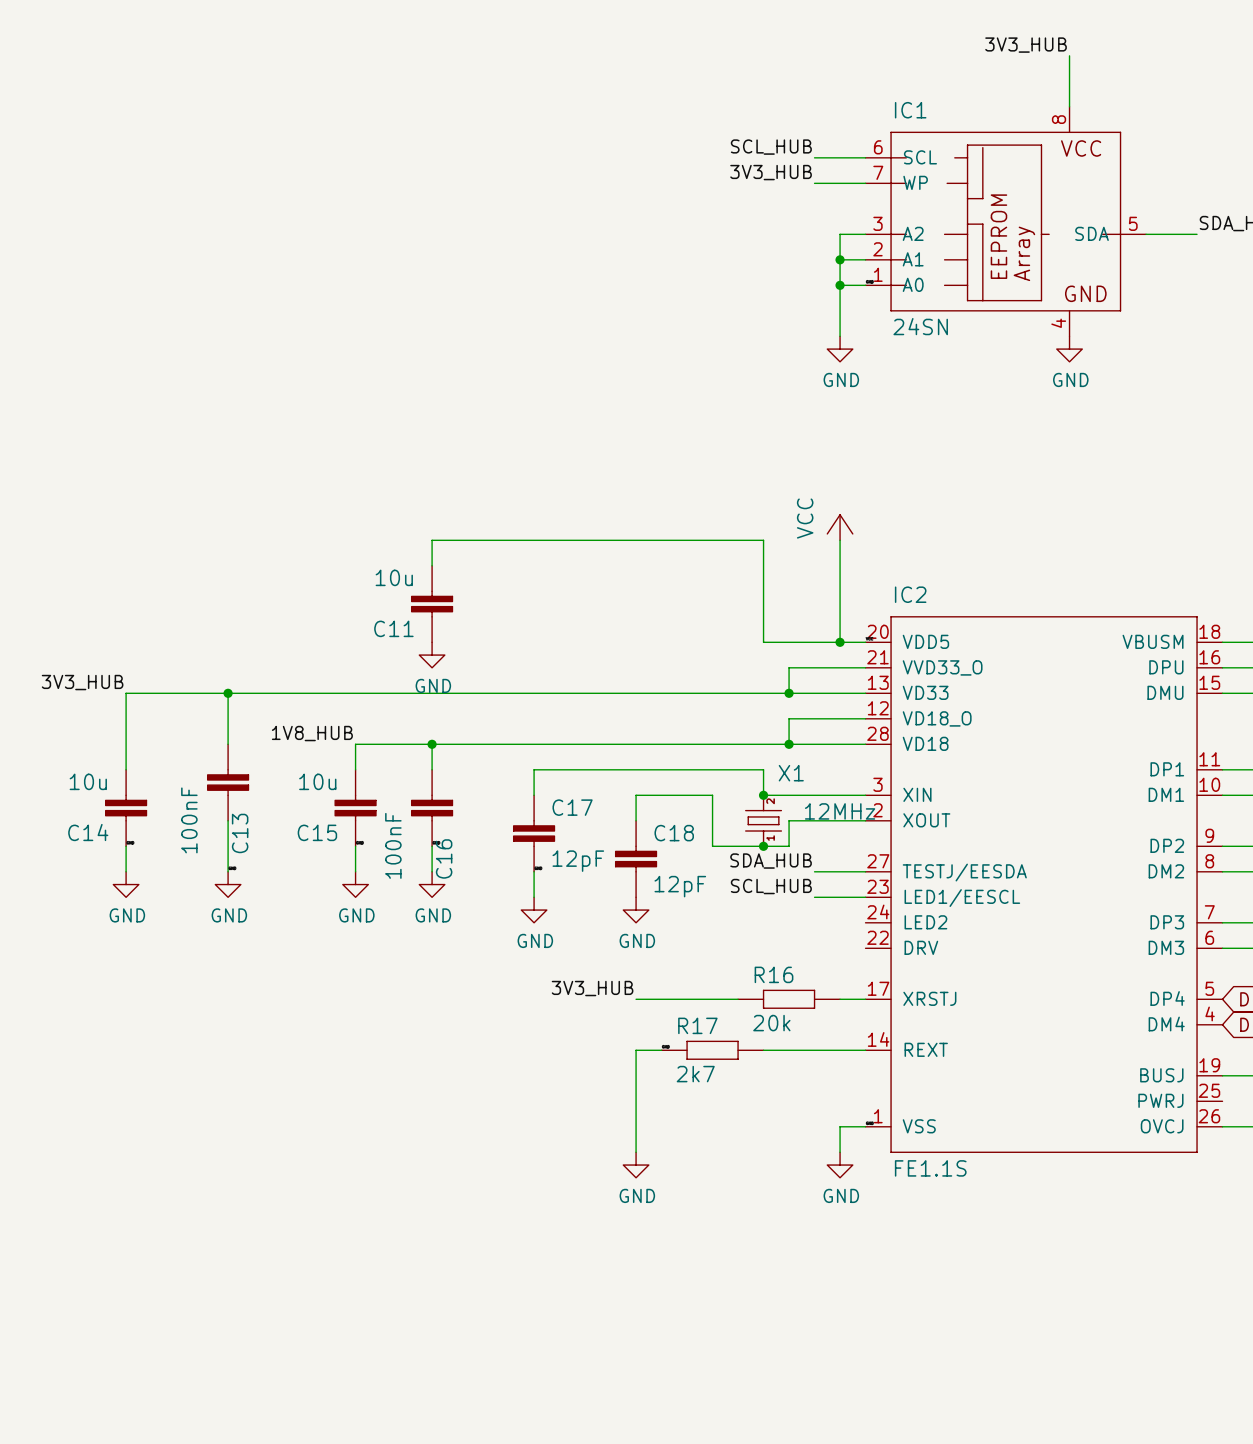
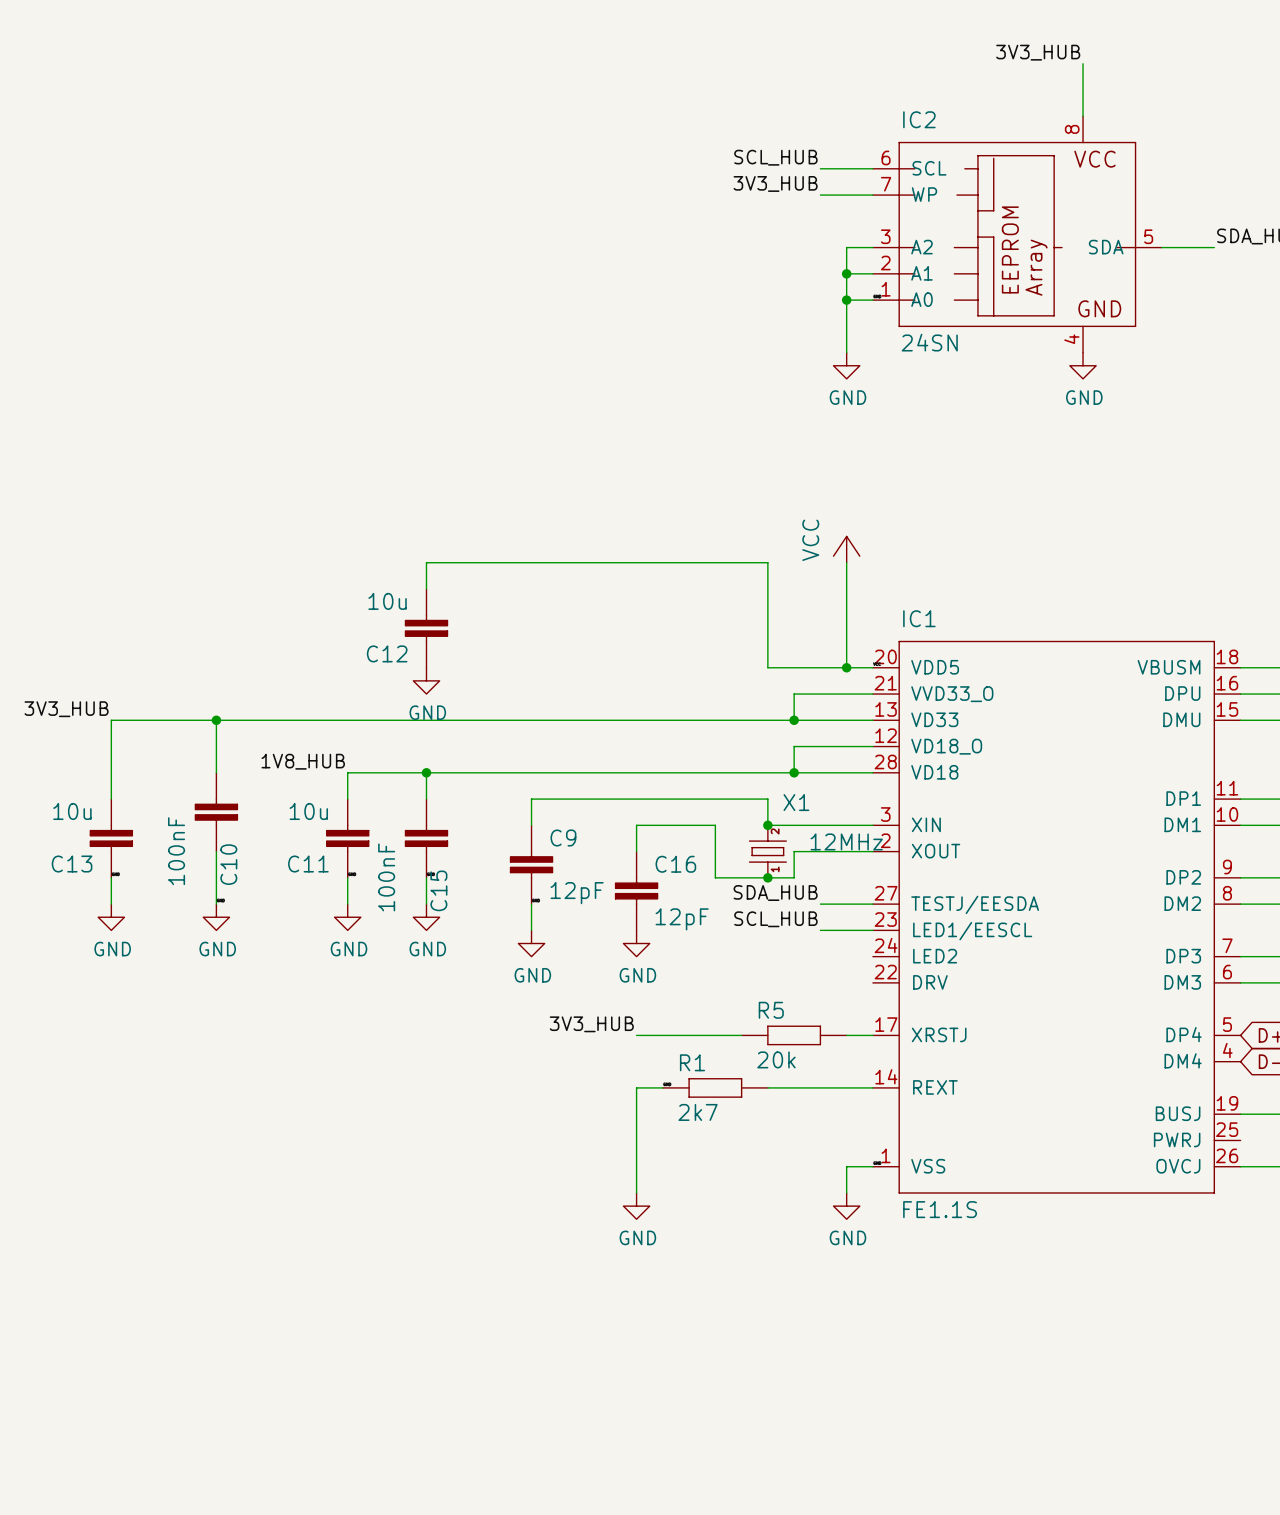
IC1 name: IC1 (910, 110) -> IC2 (919, 119)
IC2 name: IC2 (910, 594) -> IC1 (919, 618)
C11 name: C11 (393, 628) -> C12 (387, 653)
C17 name: C17 (572, 807) -> C9 (563, 838)
C14 name: C14 (88, 832) -> C13 (72, 864)
C15 name: C15 (317, 832) -> C11 (308, 864)
C13 name: C13 (240, 833) -> C10 (228, 864)
C18 name: C18 (674, 833) -> C16 (675, 864)
C16 name: C16 (444, 858) -> C15 (438, 890)
R16 name: R16 (774, 974) -> R5 (771, 1010)
R17 name: R17 (697, 1025) -> R1 (692, 1062)

